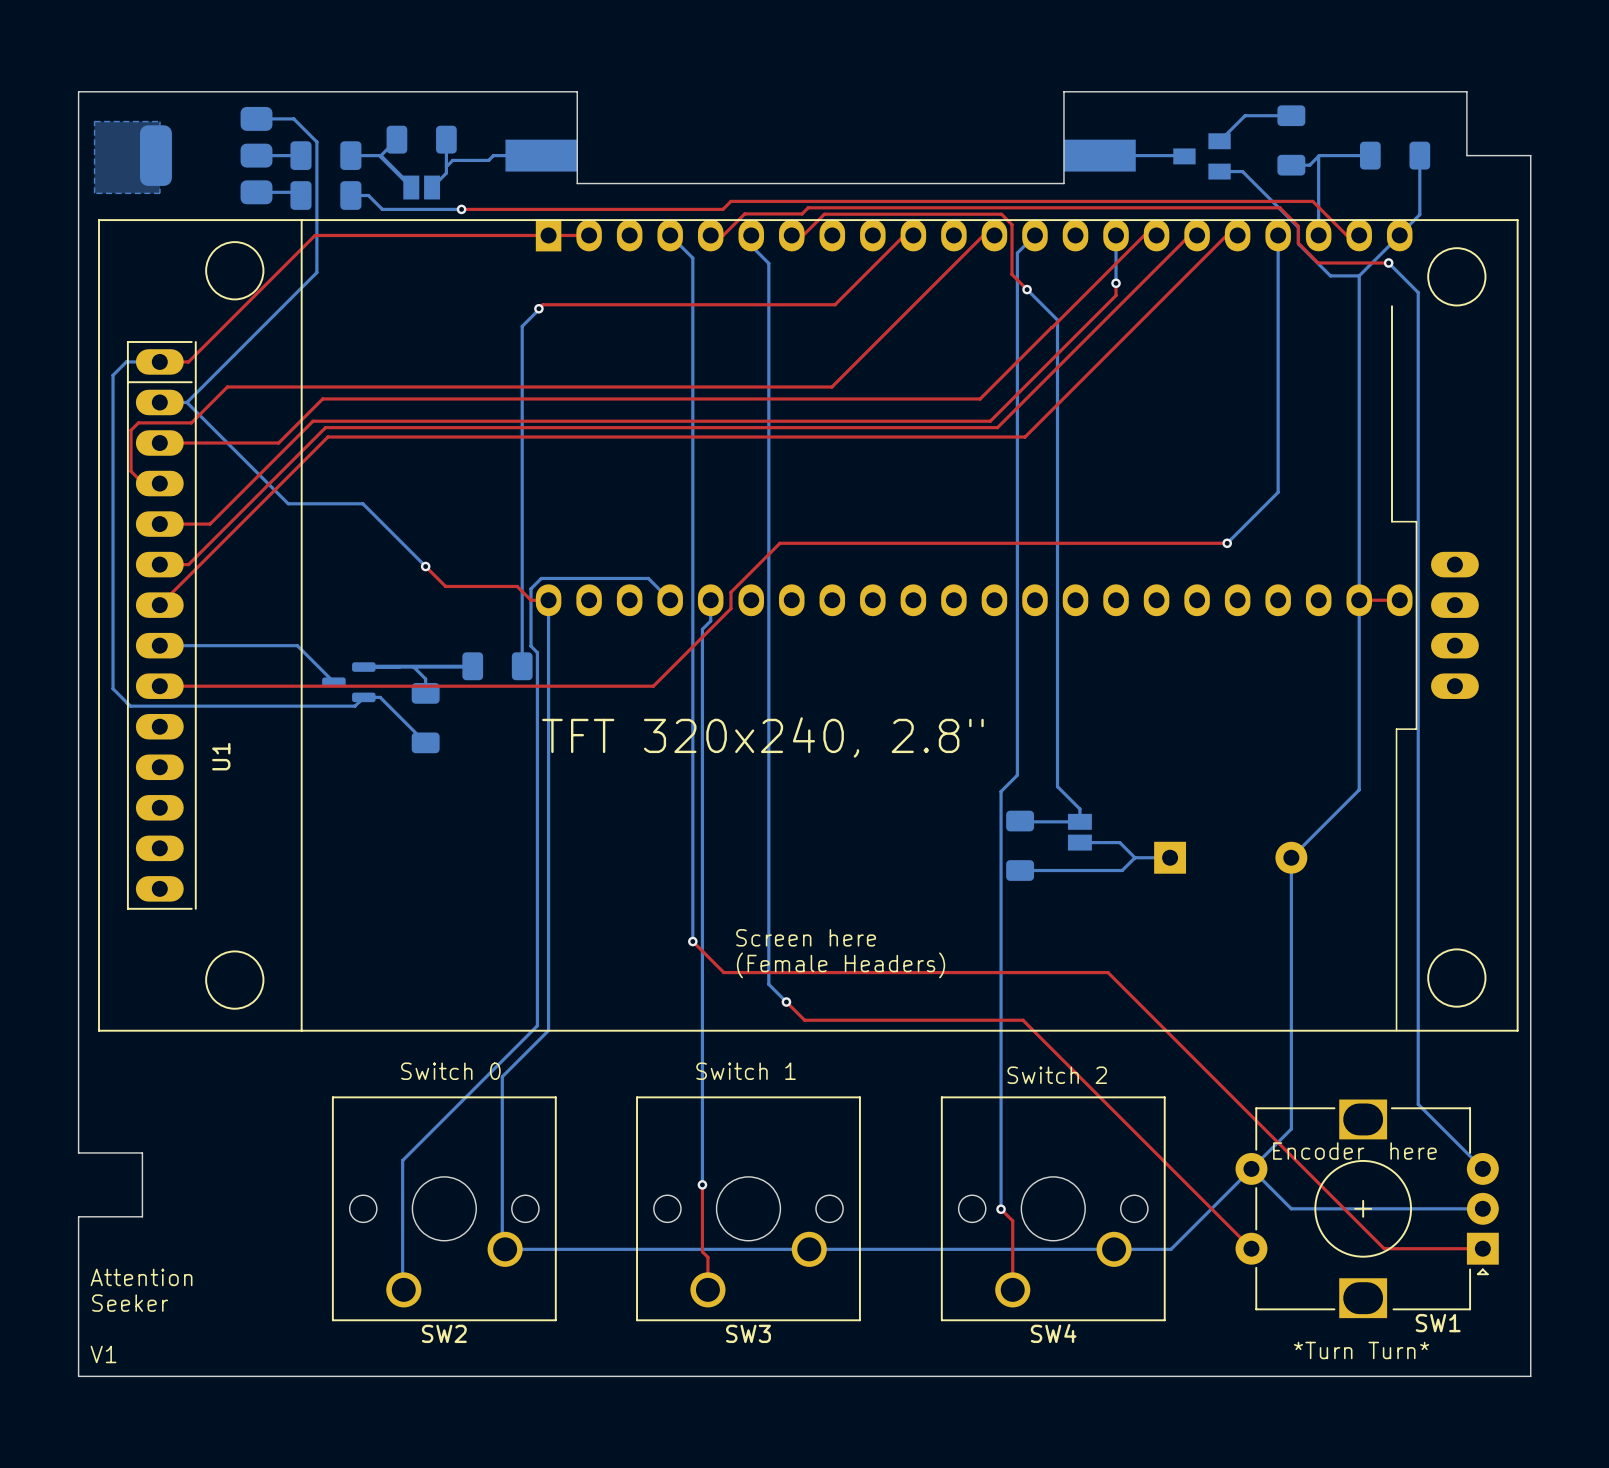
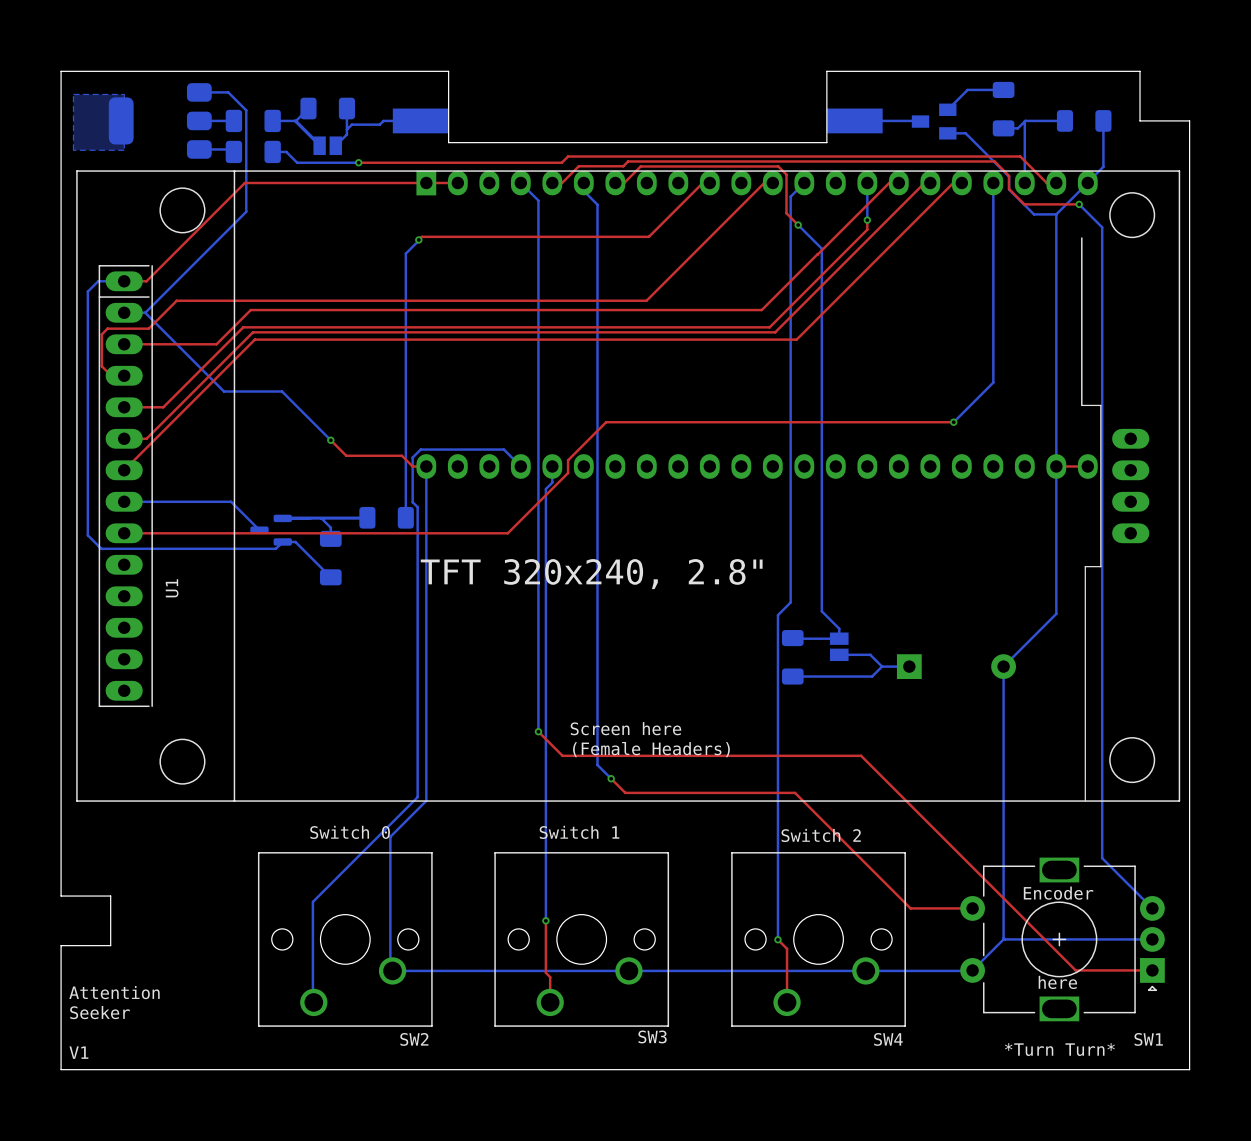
SW1 footprint: [1235, 1099, 1499, 1319] -> [960, 857, 1165, 1022]
bottom track: (1291, 1129) (1171, 1249) -> (1003, 939) (972, 970) (910, 970)
bottom track: none -> (1003, 877) (1004, 939)
text position: Encoder (1318, 1151) -> Encoder (1058, 893)
text position: here (1413, 1151) -> here (1057, 982)
top track: (1171, 1168) (1251, 1248) -> (910, 908) (972, 908)
bottom track: (1251, 1168) (1291, 1208) -> none
SW1 name position: SW1 (1438, 1323) -> SW1 (1148, 1039)
SW2 name position: SW2 (444, 1333) -> SW2 (414, 1039)
SW3 name position: SW3 (748, 1333) -> SW3 (652, 1036)
SW4 name position: SW4 (1053, 1333) -> SW4 (888, 1039)

